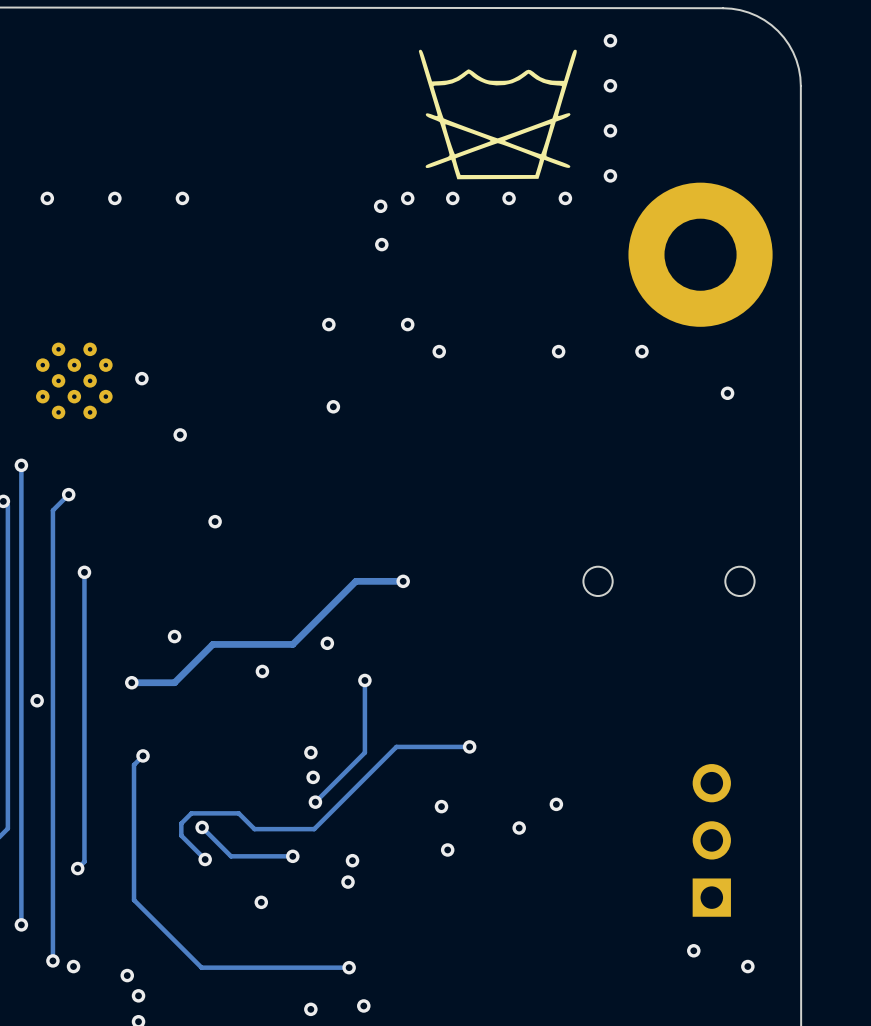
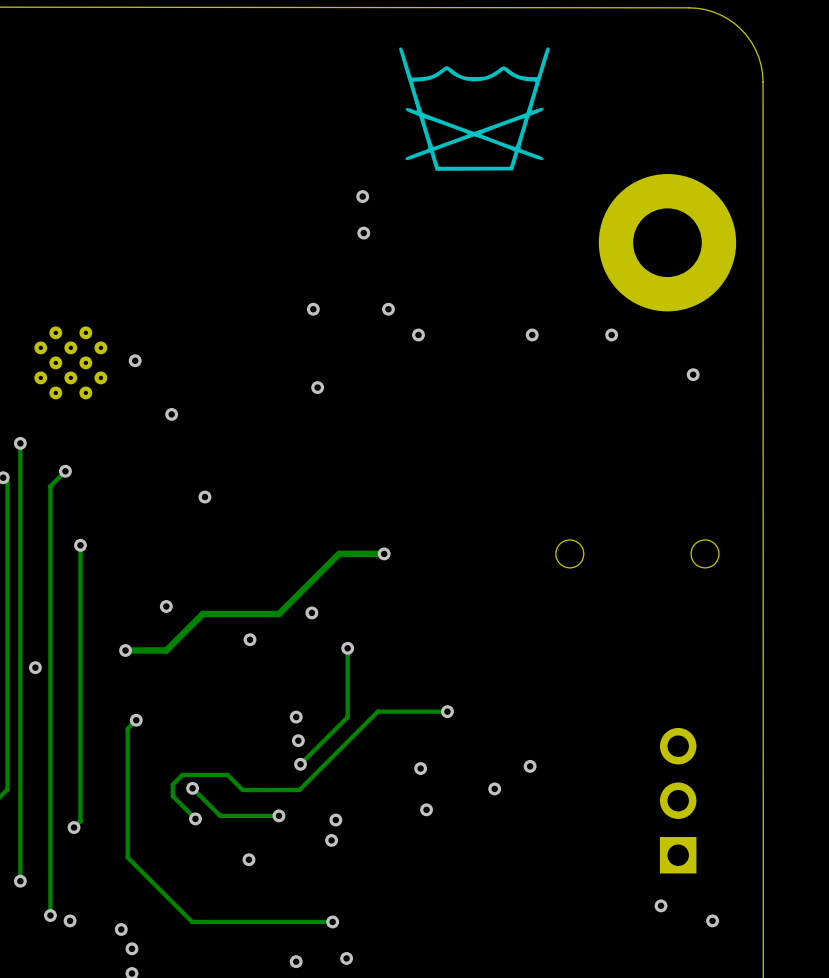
via: (610, 40) -> none
via: (610, 85) -> none
via: (610, 130) -> none
via: (610, 175) -> none
via: (47, 198) -> none
via: (114, 198) -> none
via: (182, 198) -> none
via: (407, 198) -> none
via: (452, 198) -> none
via: (509, 198) -> none
via: (565, 198) -> none

